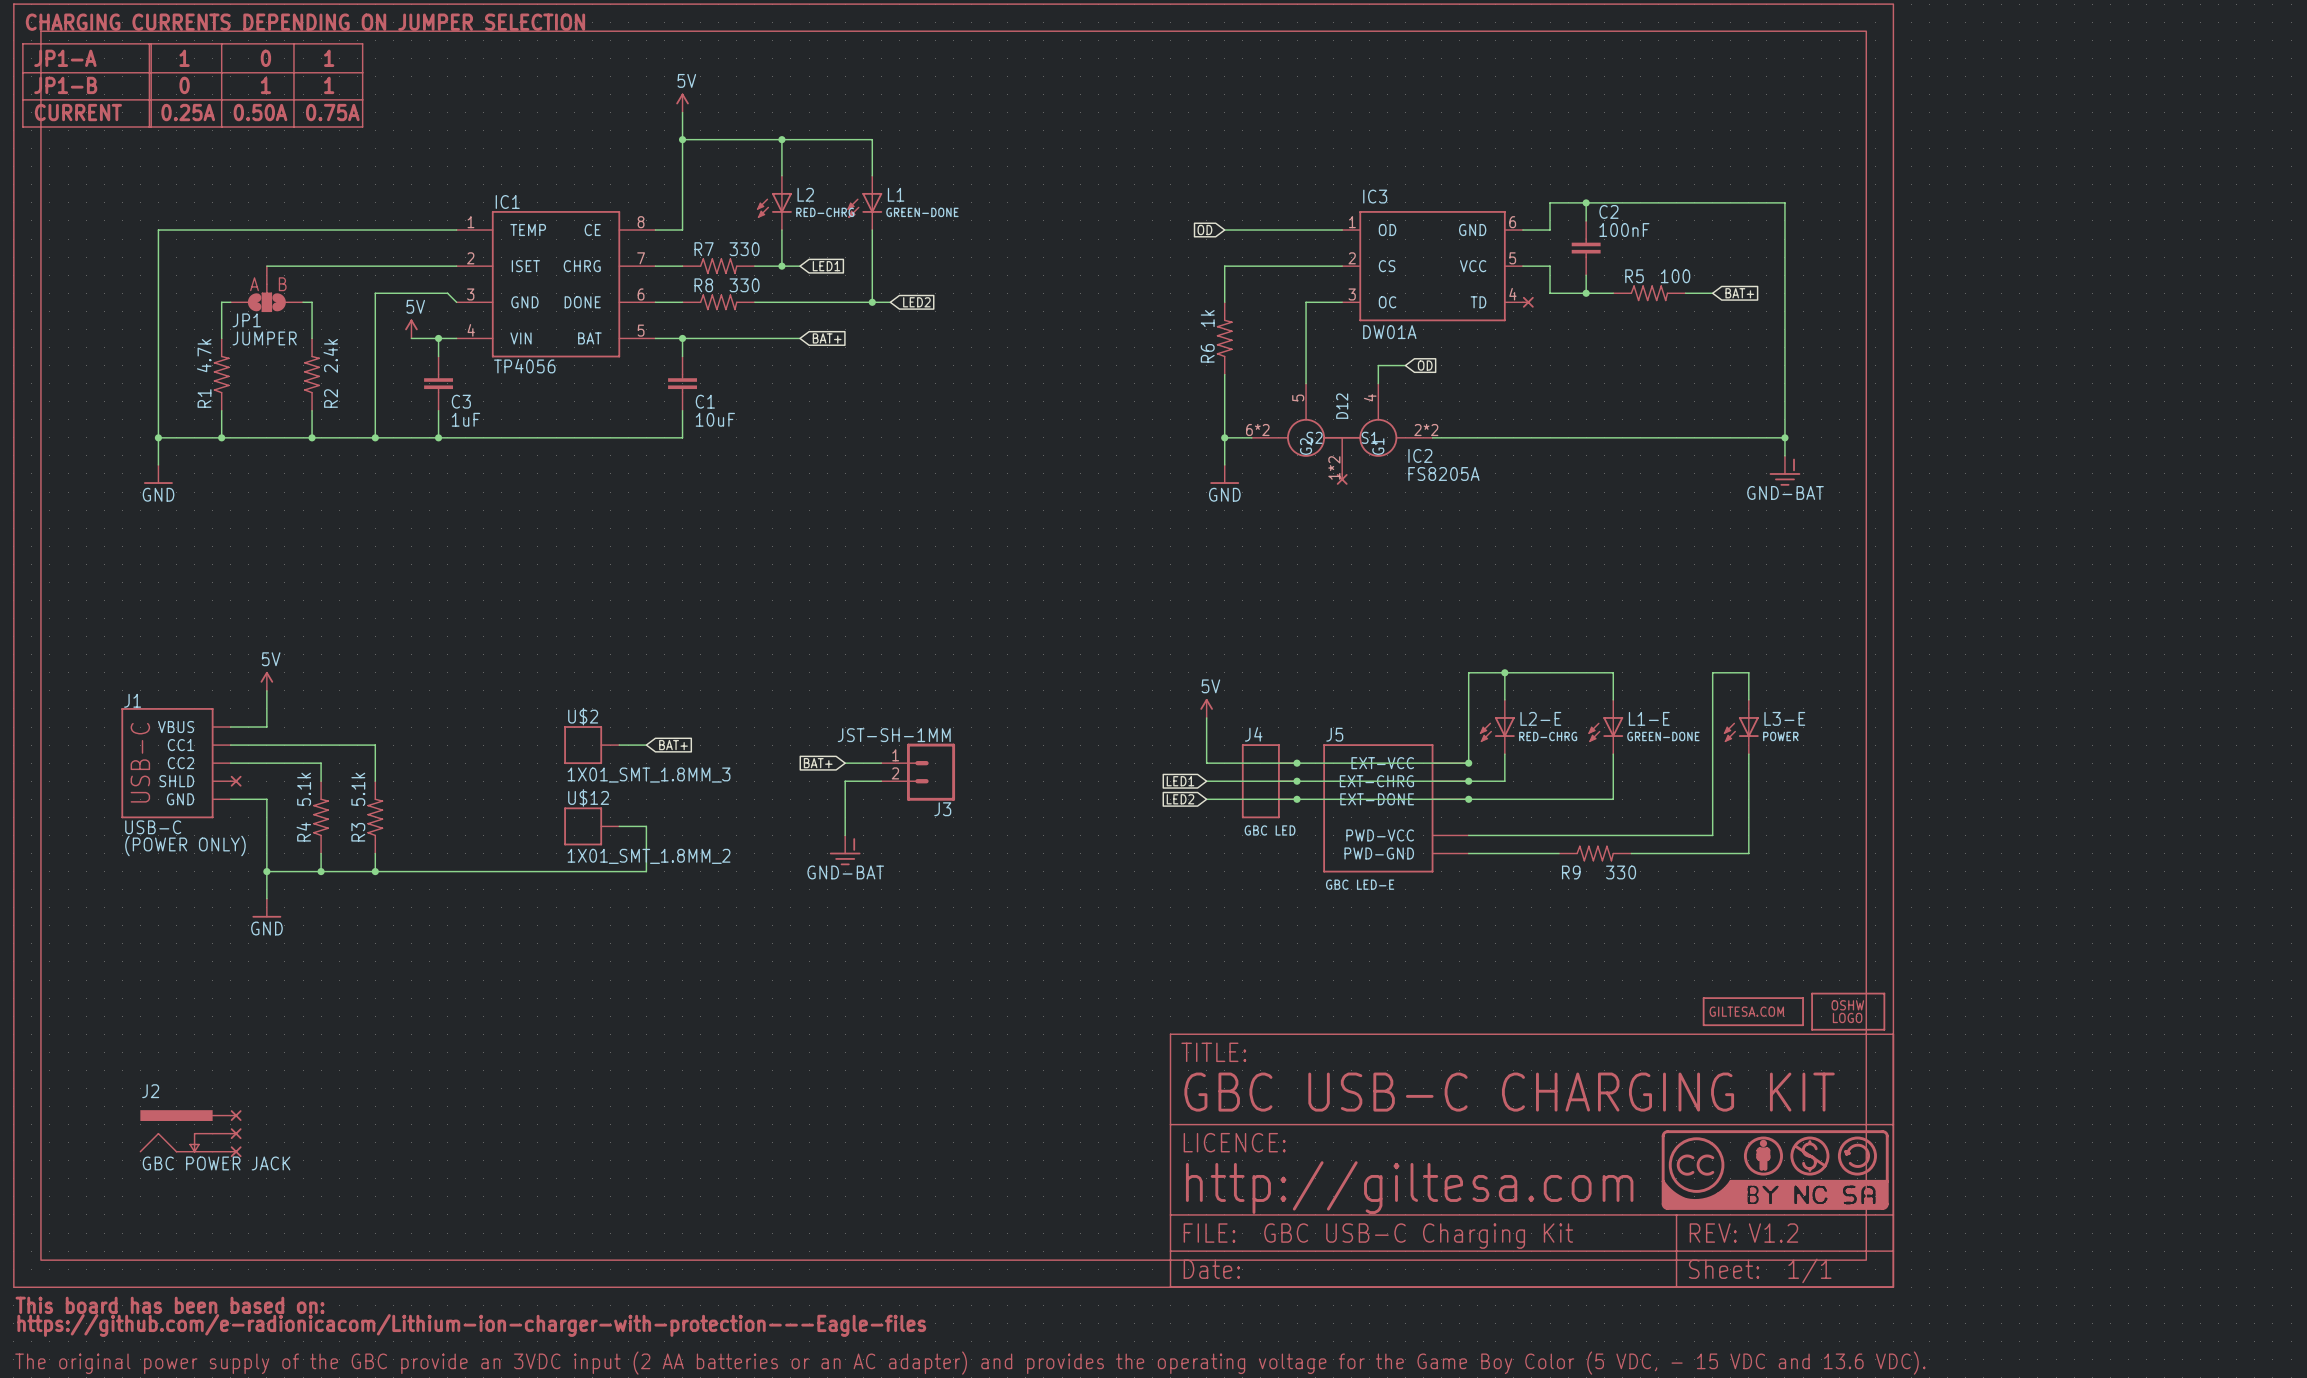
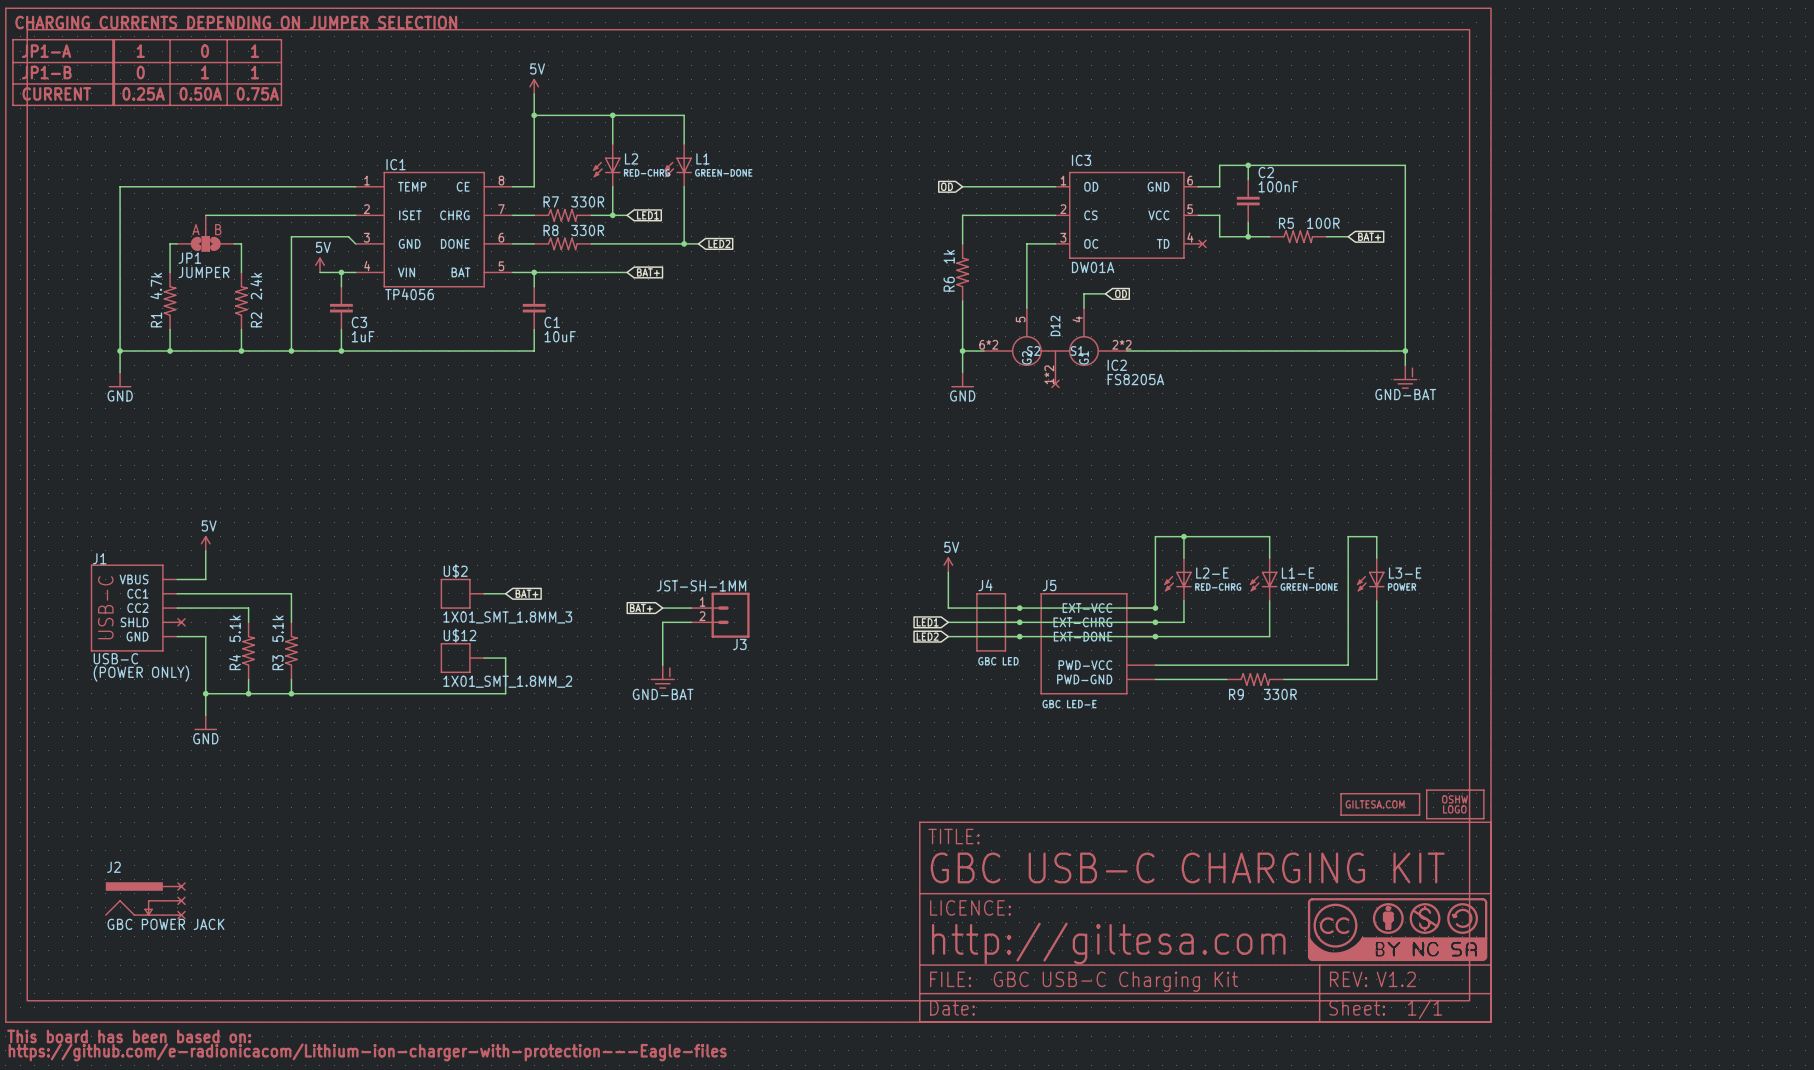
R7 value: 330 (744, 249) -> 330R (587, 201)
R5 value: 100 (1675, 276) -> 100R (1323, 223)
R8 value: 330 (744, 285) -> 330R (587, 230)
R9 value: 330 (1621, 872) -> 330R (1280, 694)

